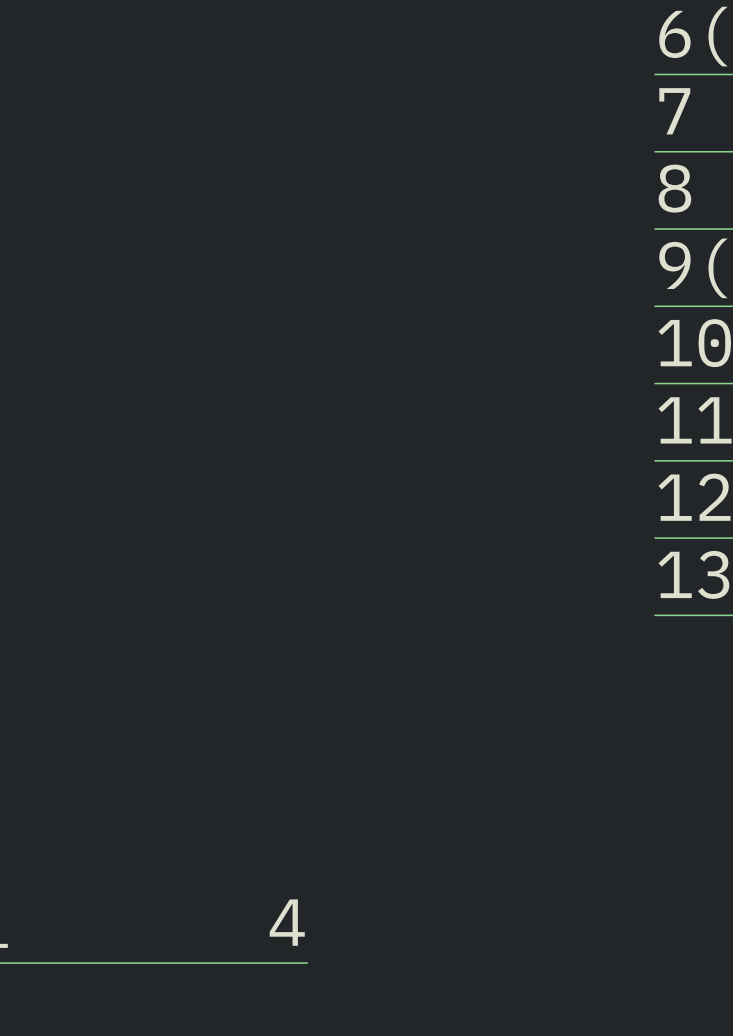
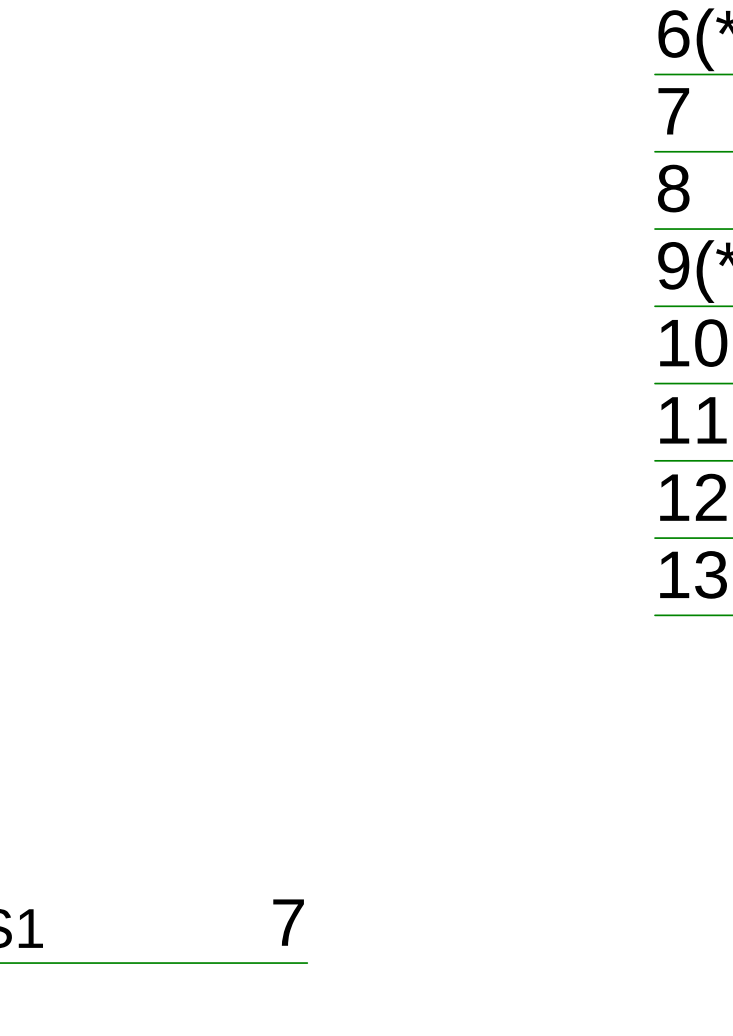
label: 4 (287, 922) -> 7 (288, 922)

